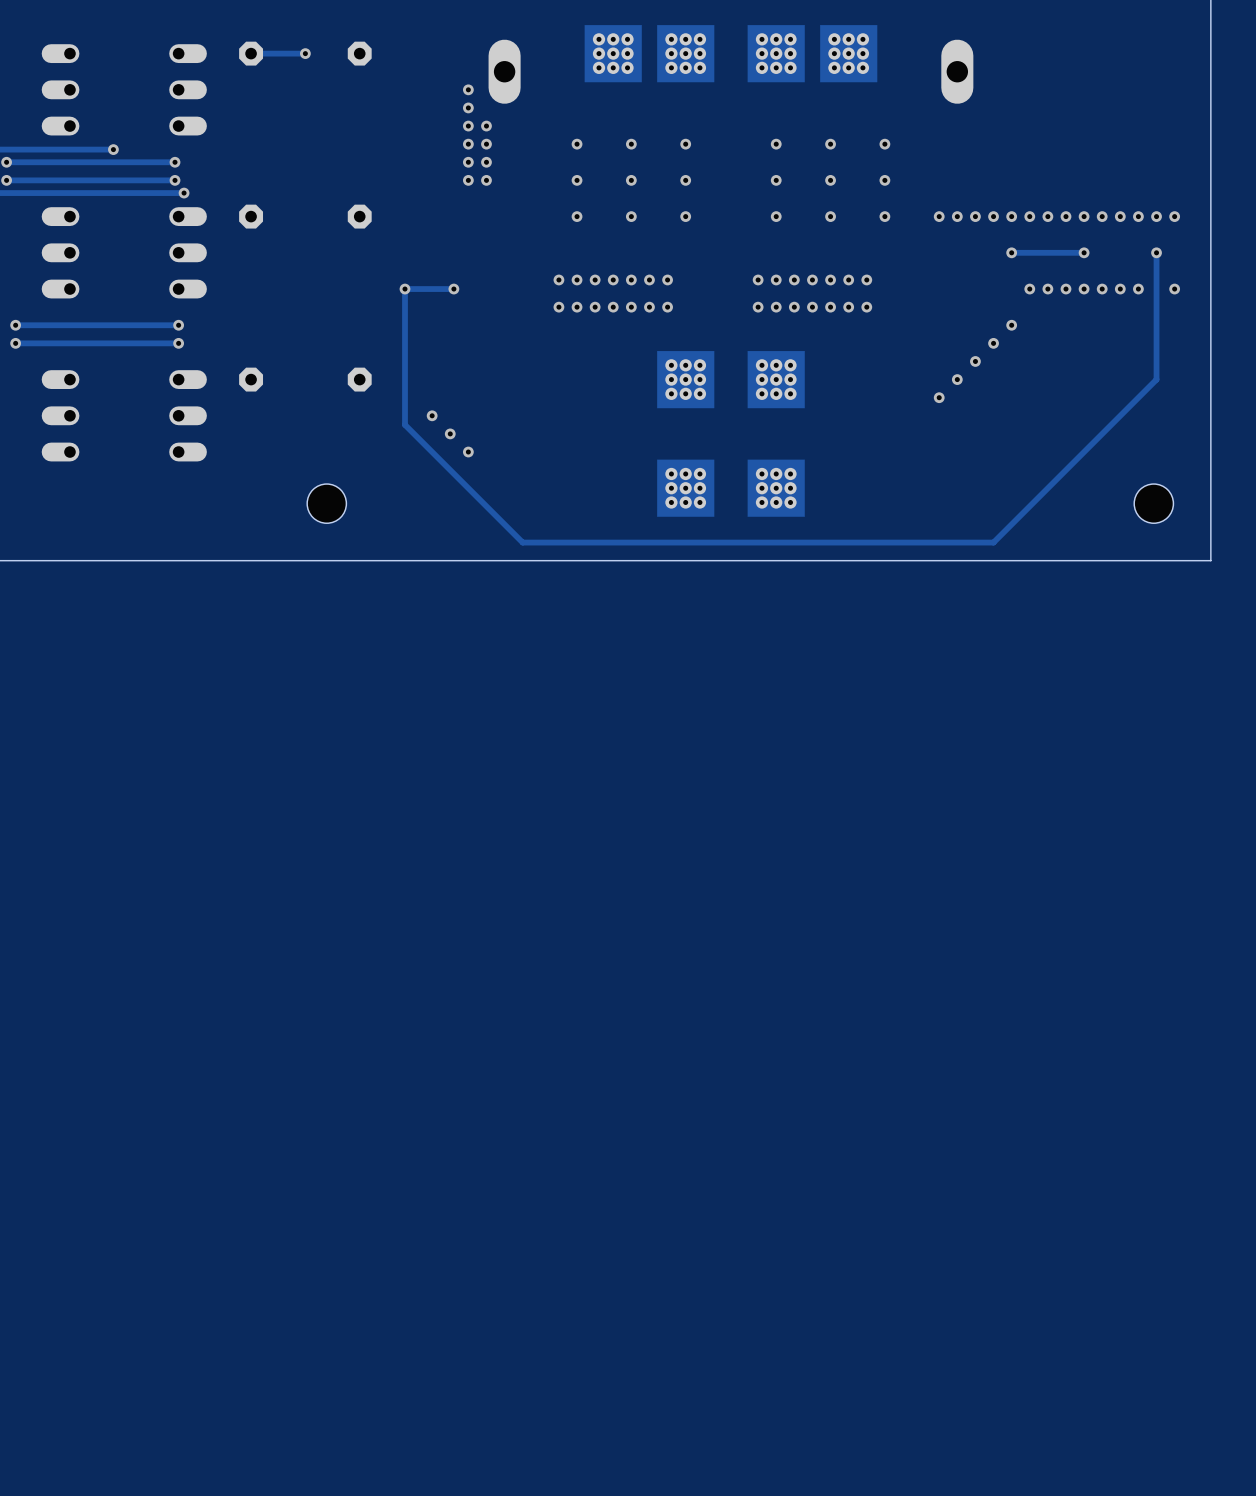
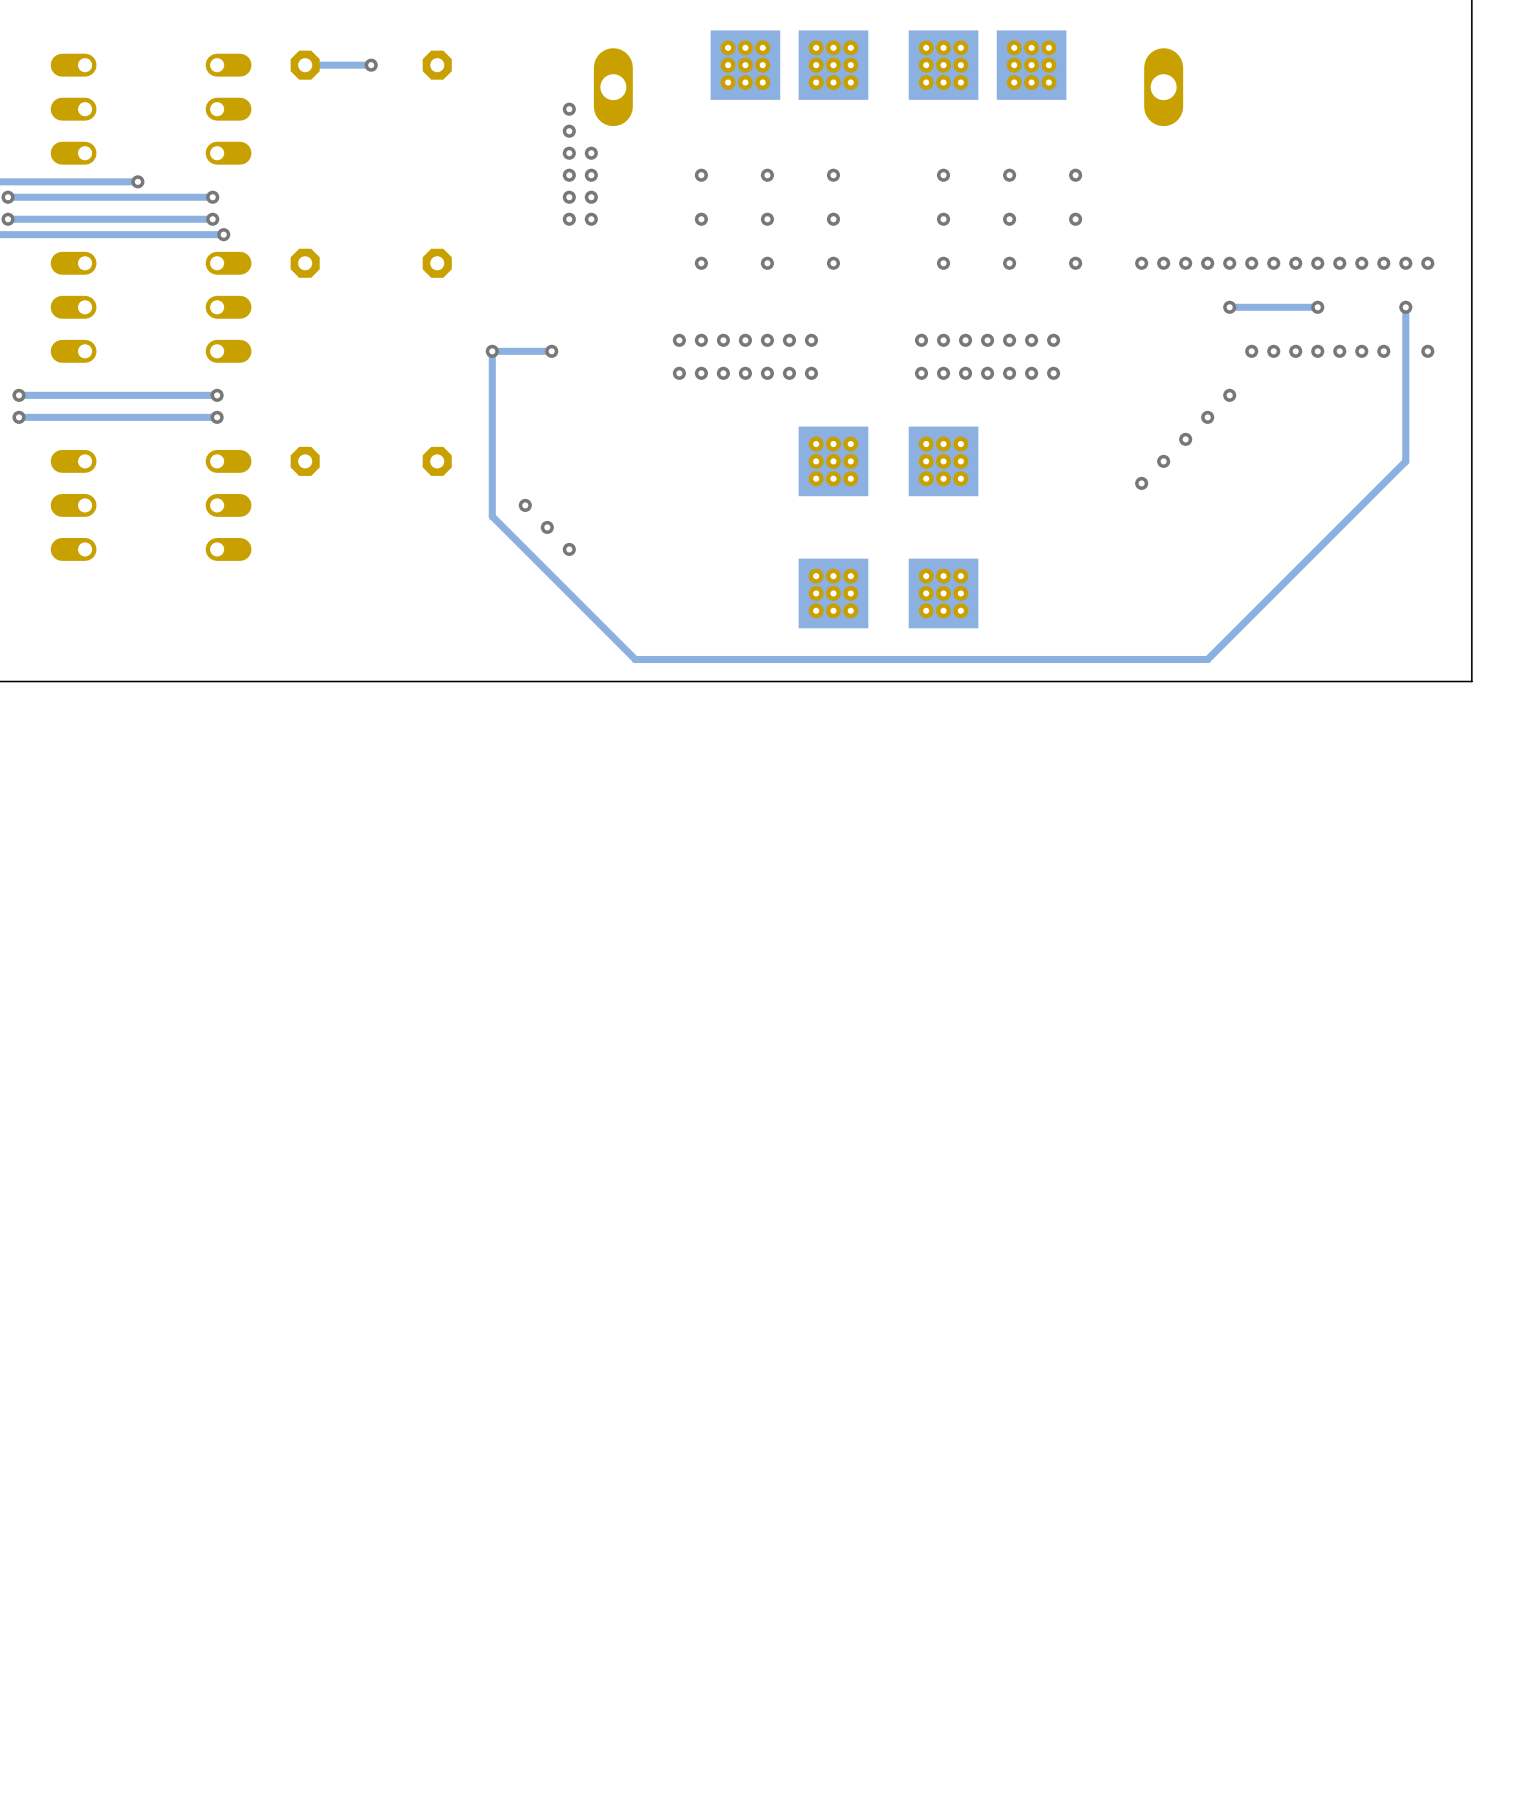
part: (326, 503) -> none
part: (1153, 503) -> none

